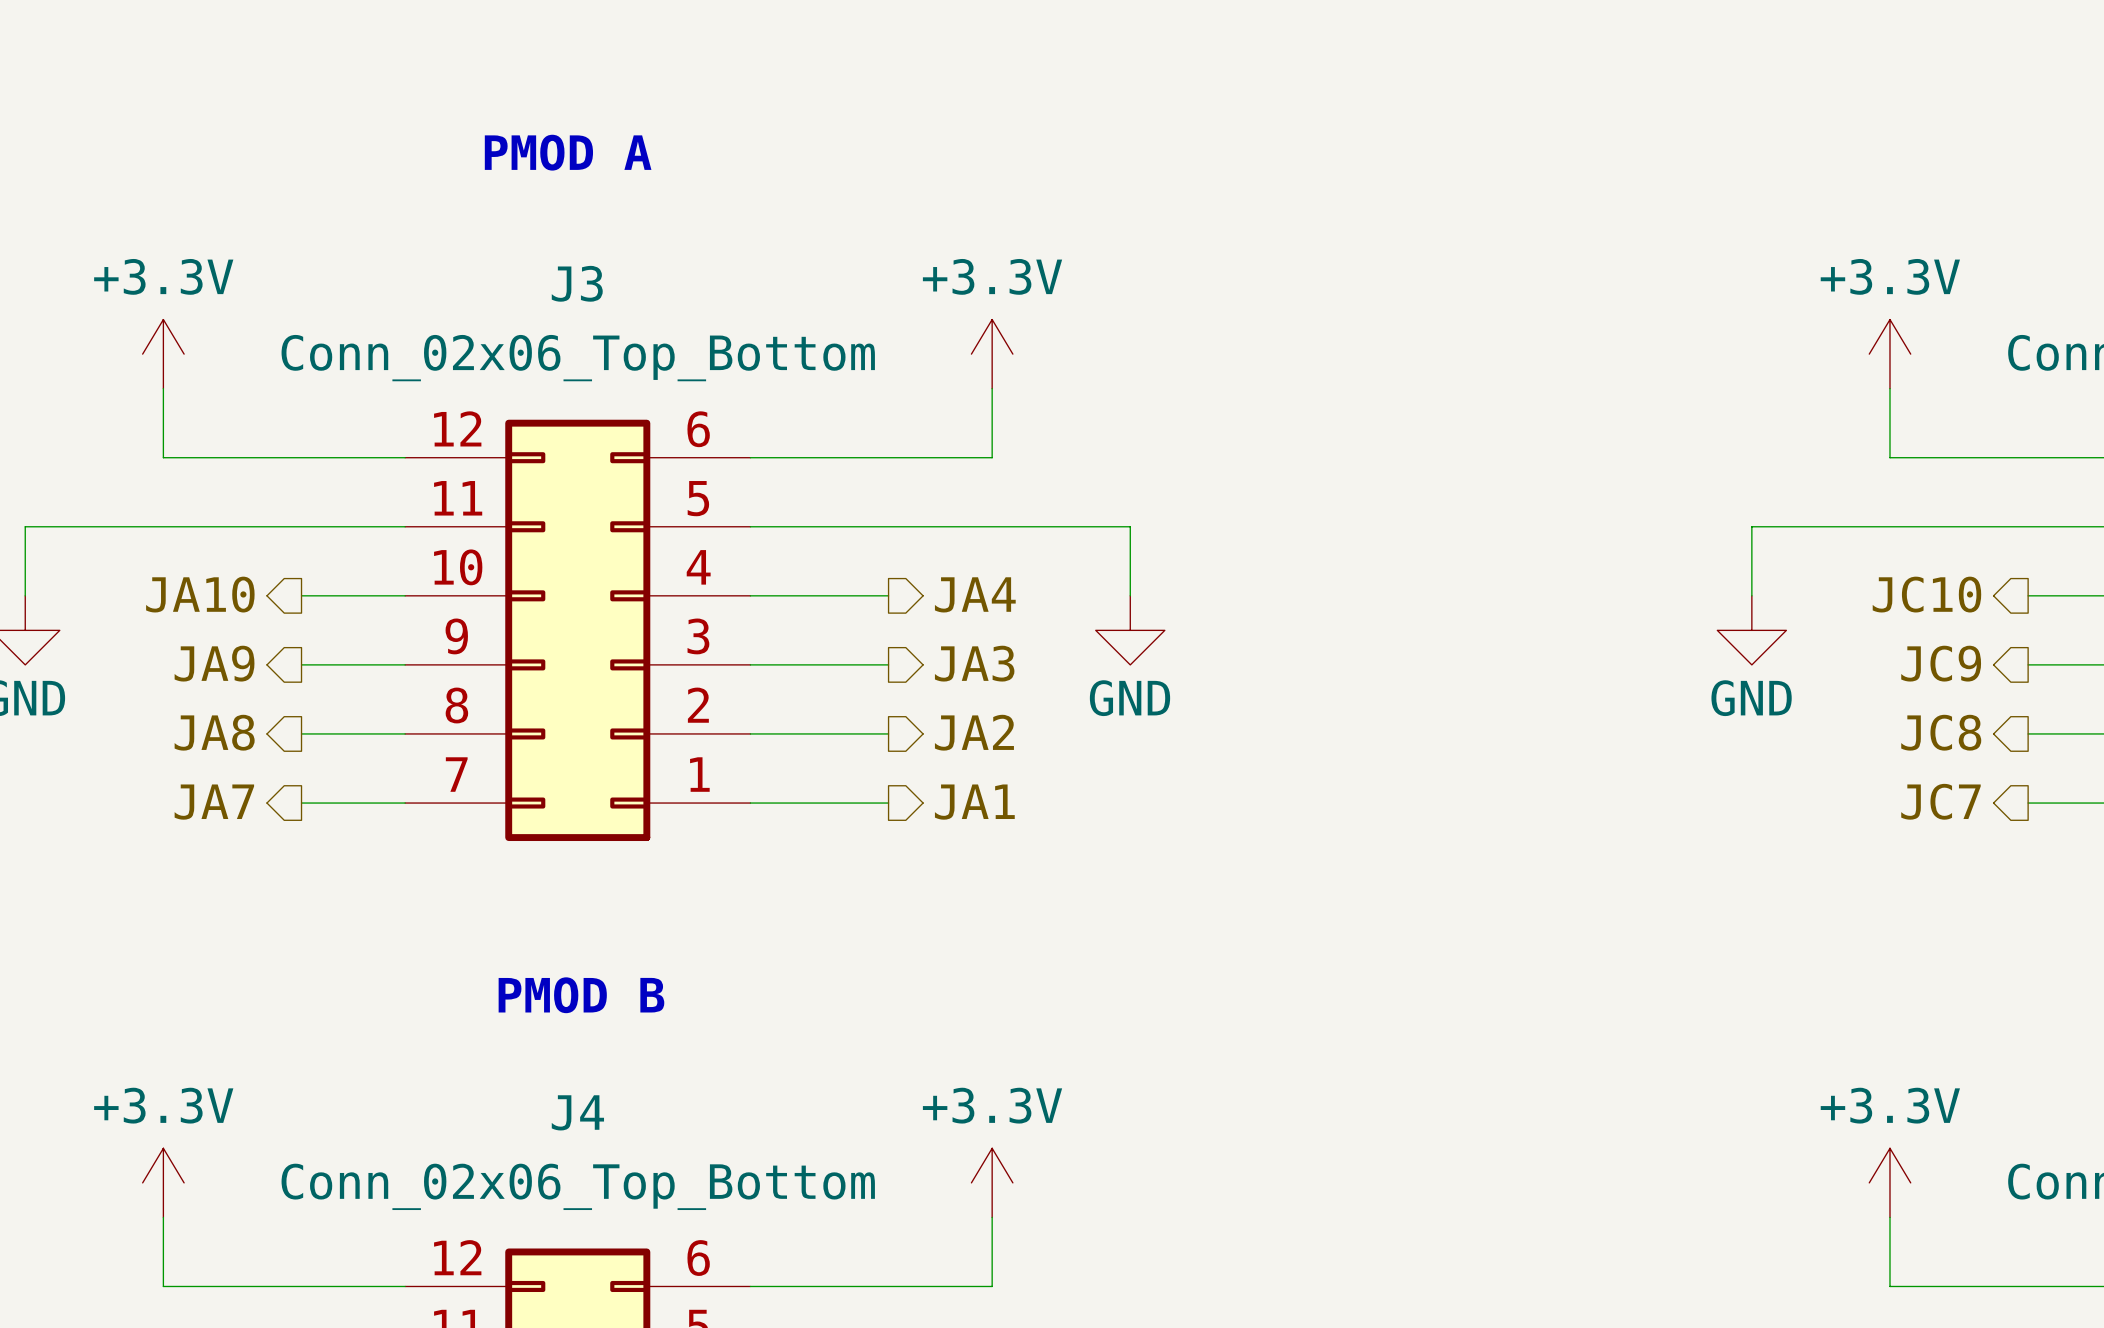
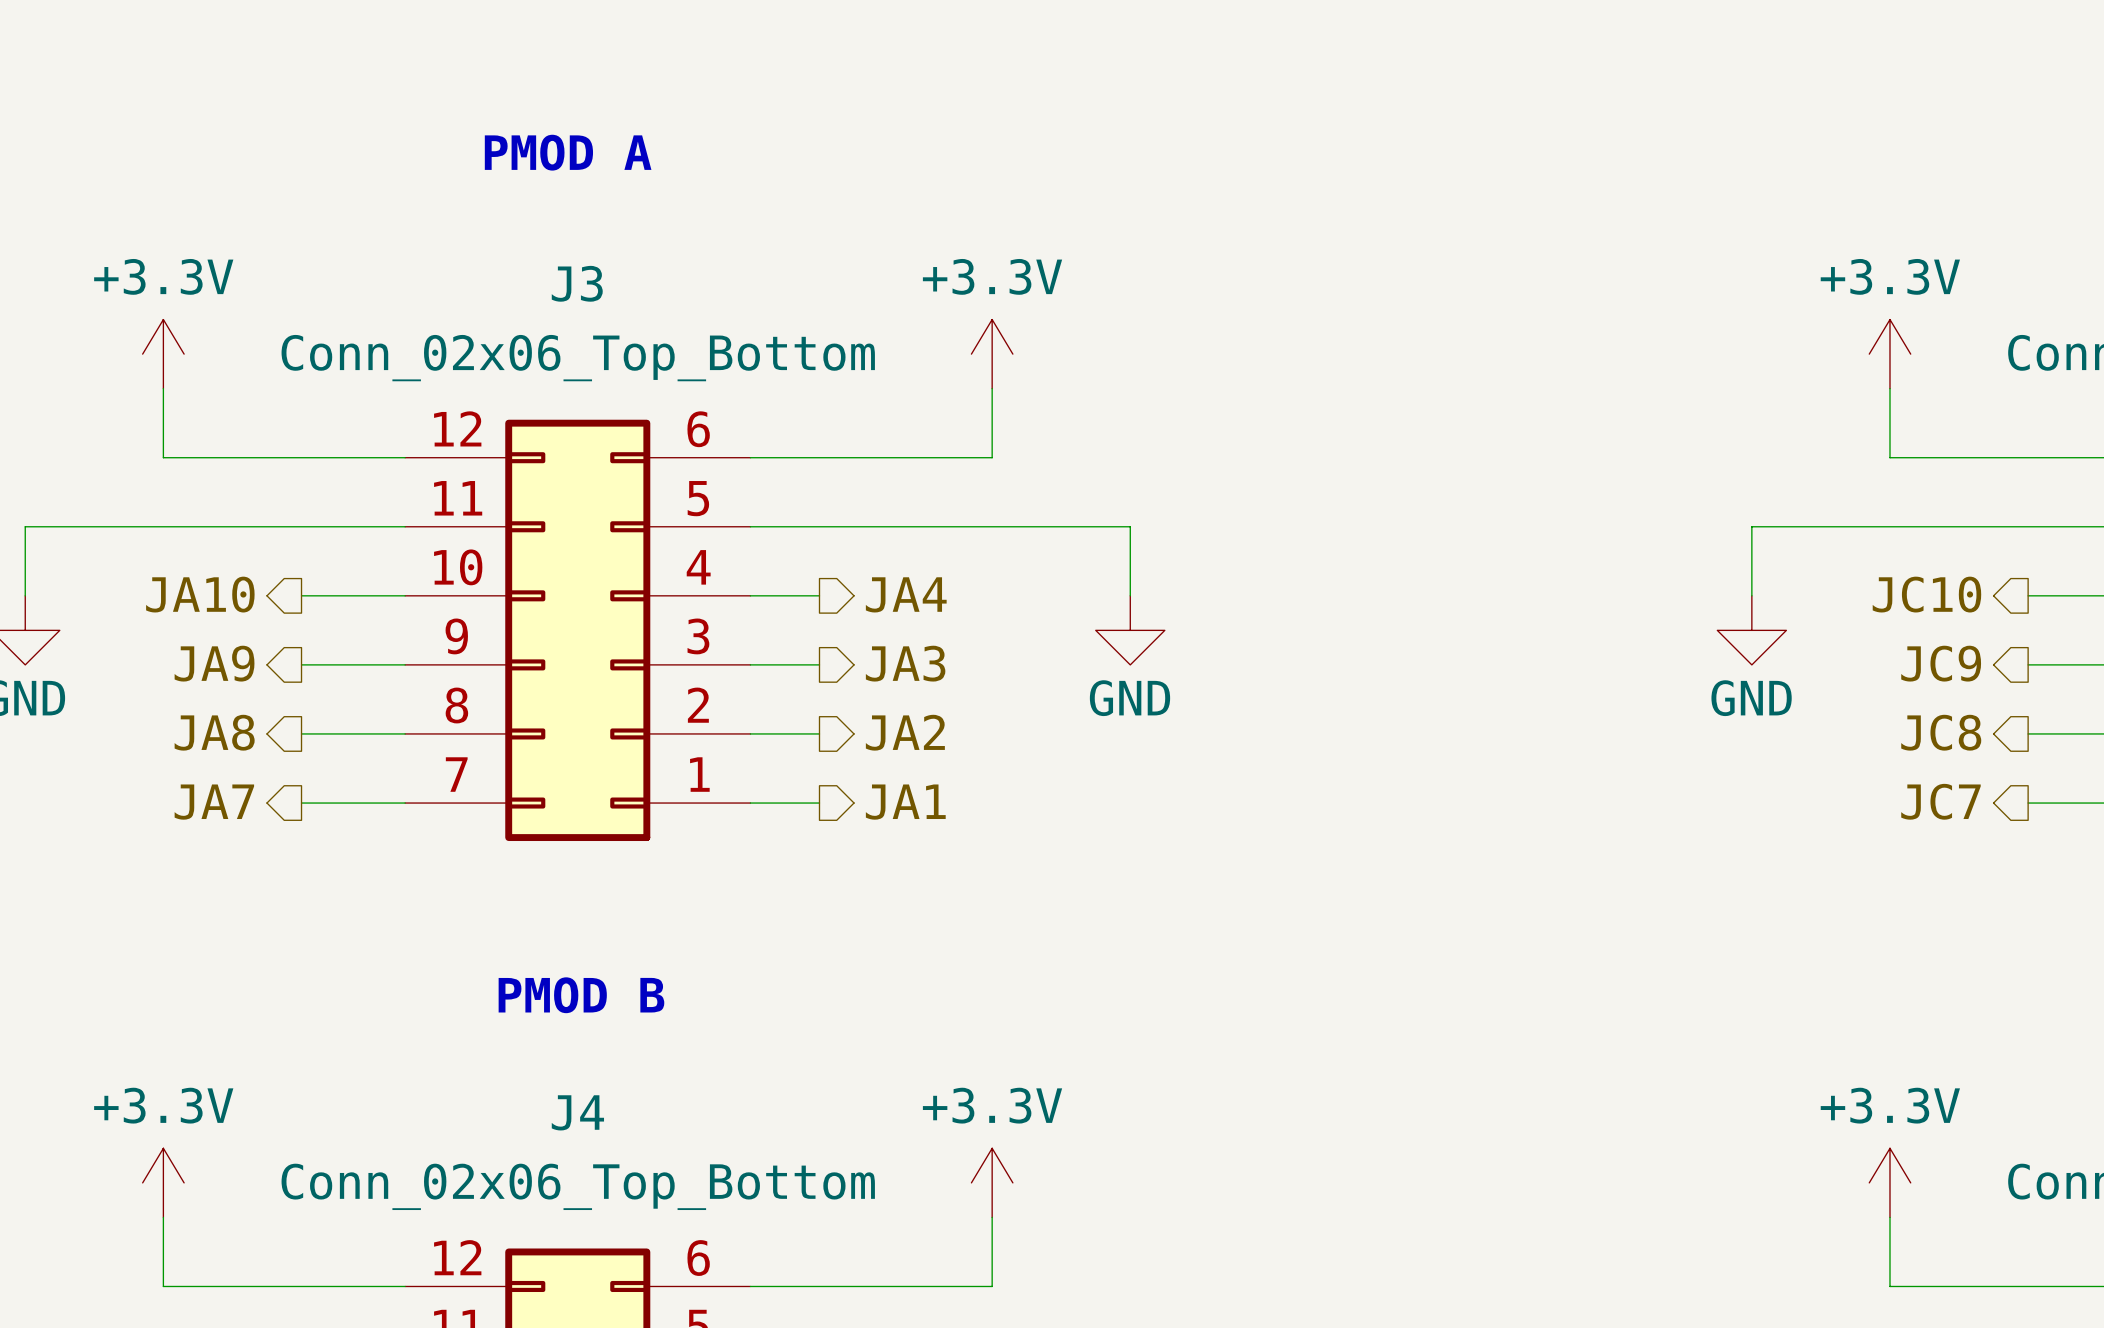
hierarchical label position: JA4 (975, 594) -> JA4 (906, 594)
wire: (819, 595) (888, 595) -> none
hierarchical label position: JA3 (974, 663) -> JA3 (905, 663)
wire: (819, 664) (888, 664) -> none
hierarchical label position: JA2 (974, 732) -> JA2 (905, 732)
wire: (819, 733) (888, 733) -> none
hierarchical label position: JA1 (974, 802) -> JA1 (905, 802)
wire: (819, 803) (888, 803) -> none

